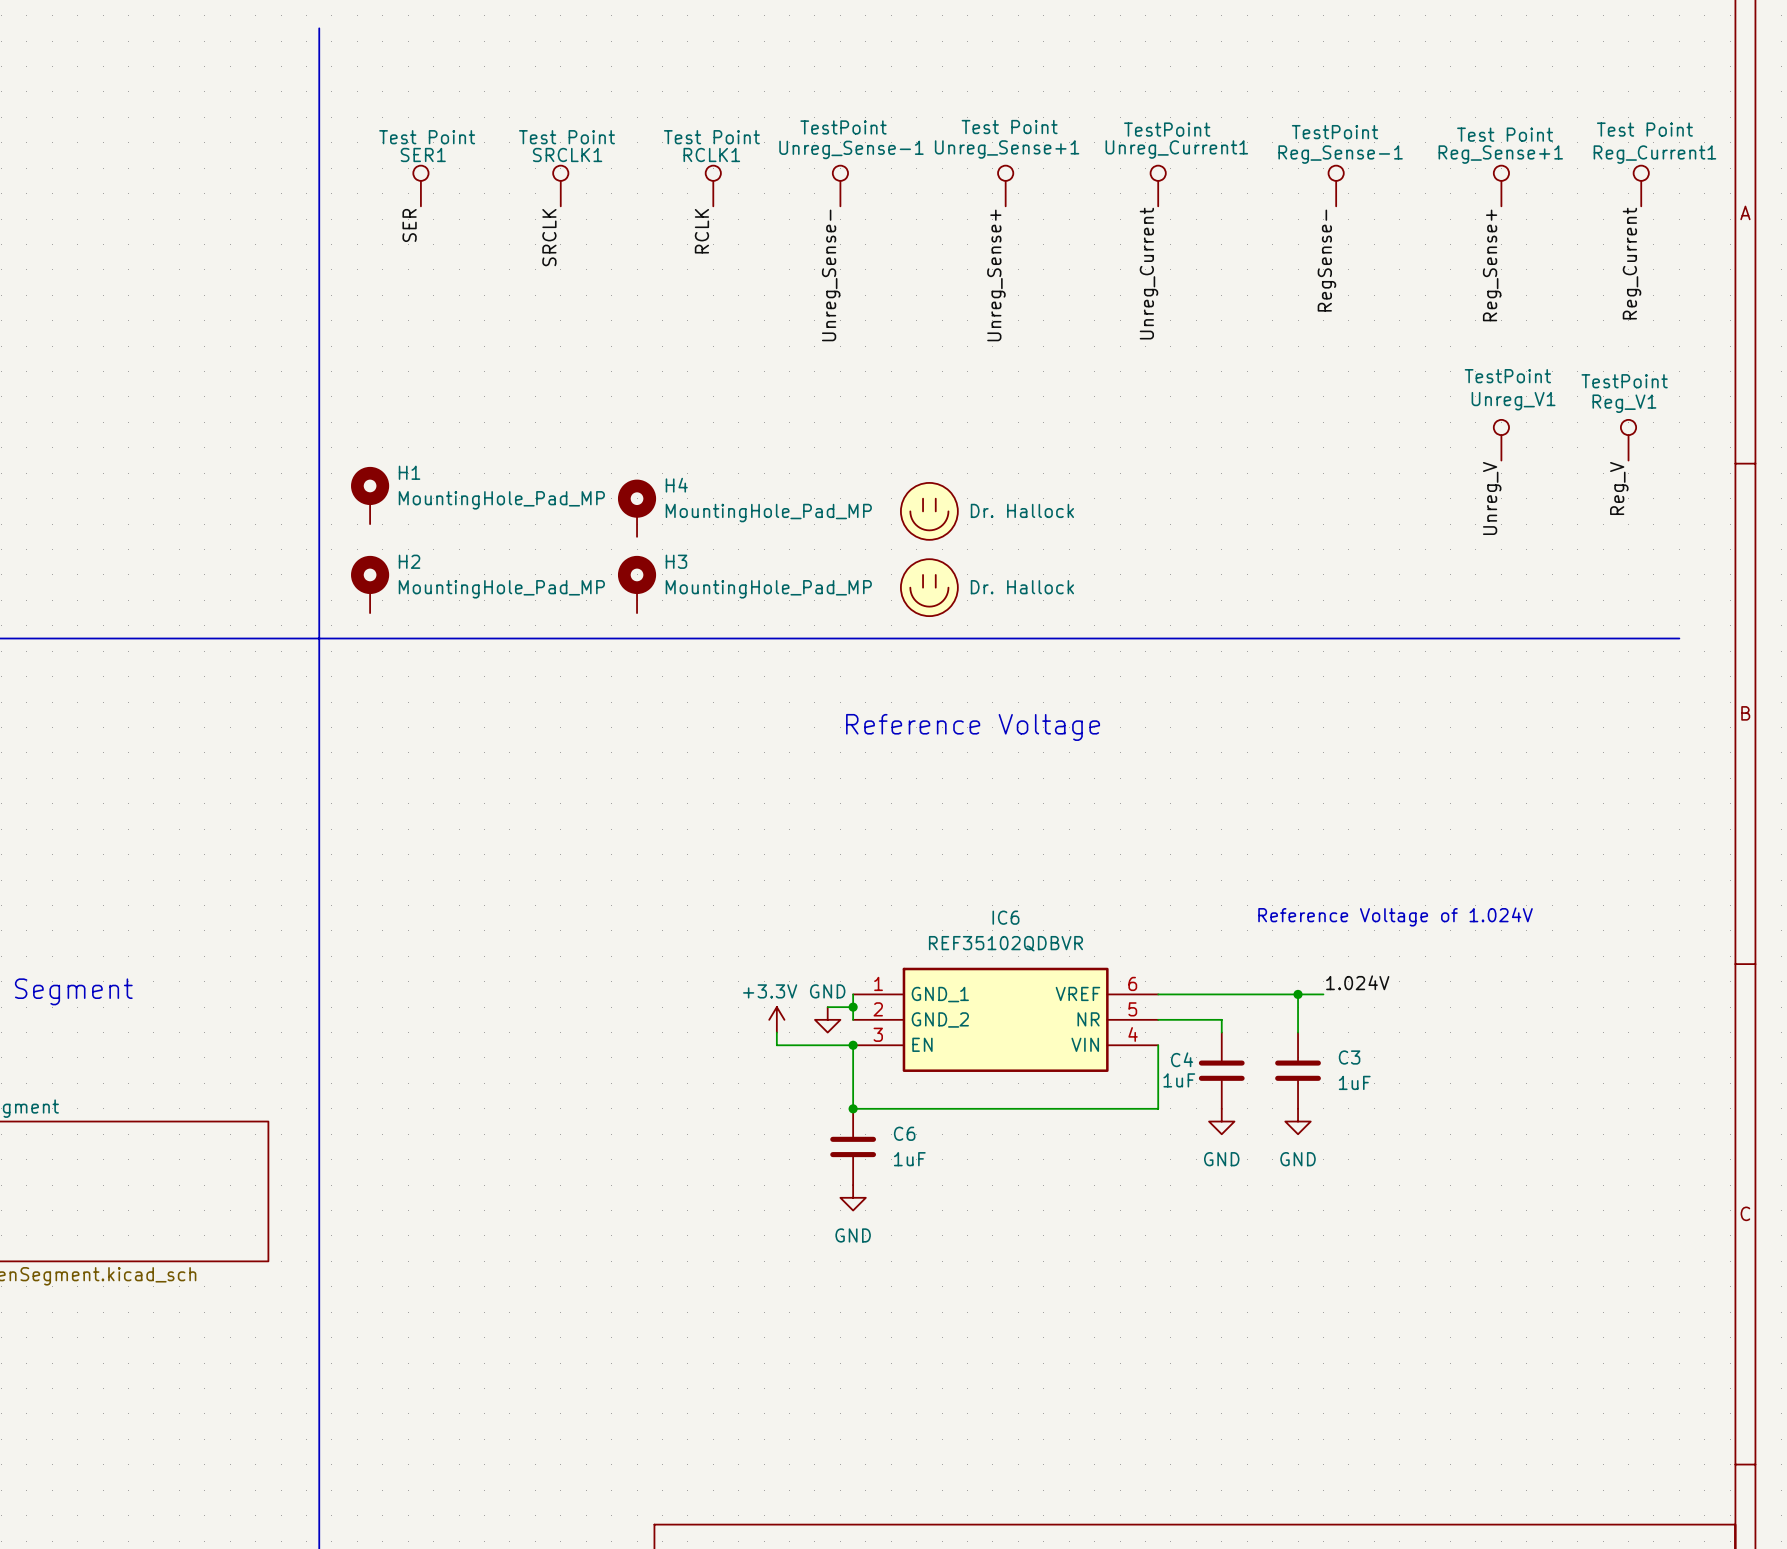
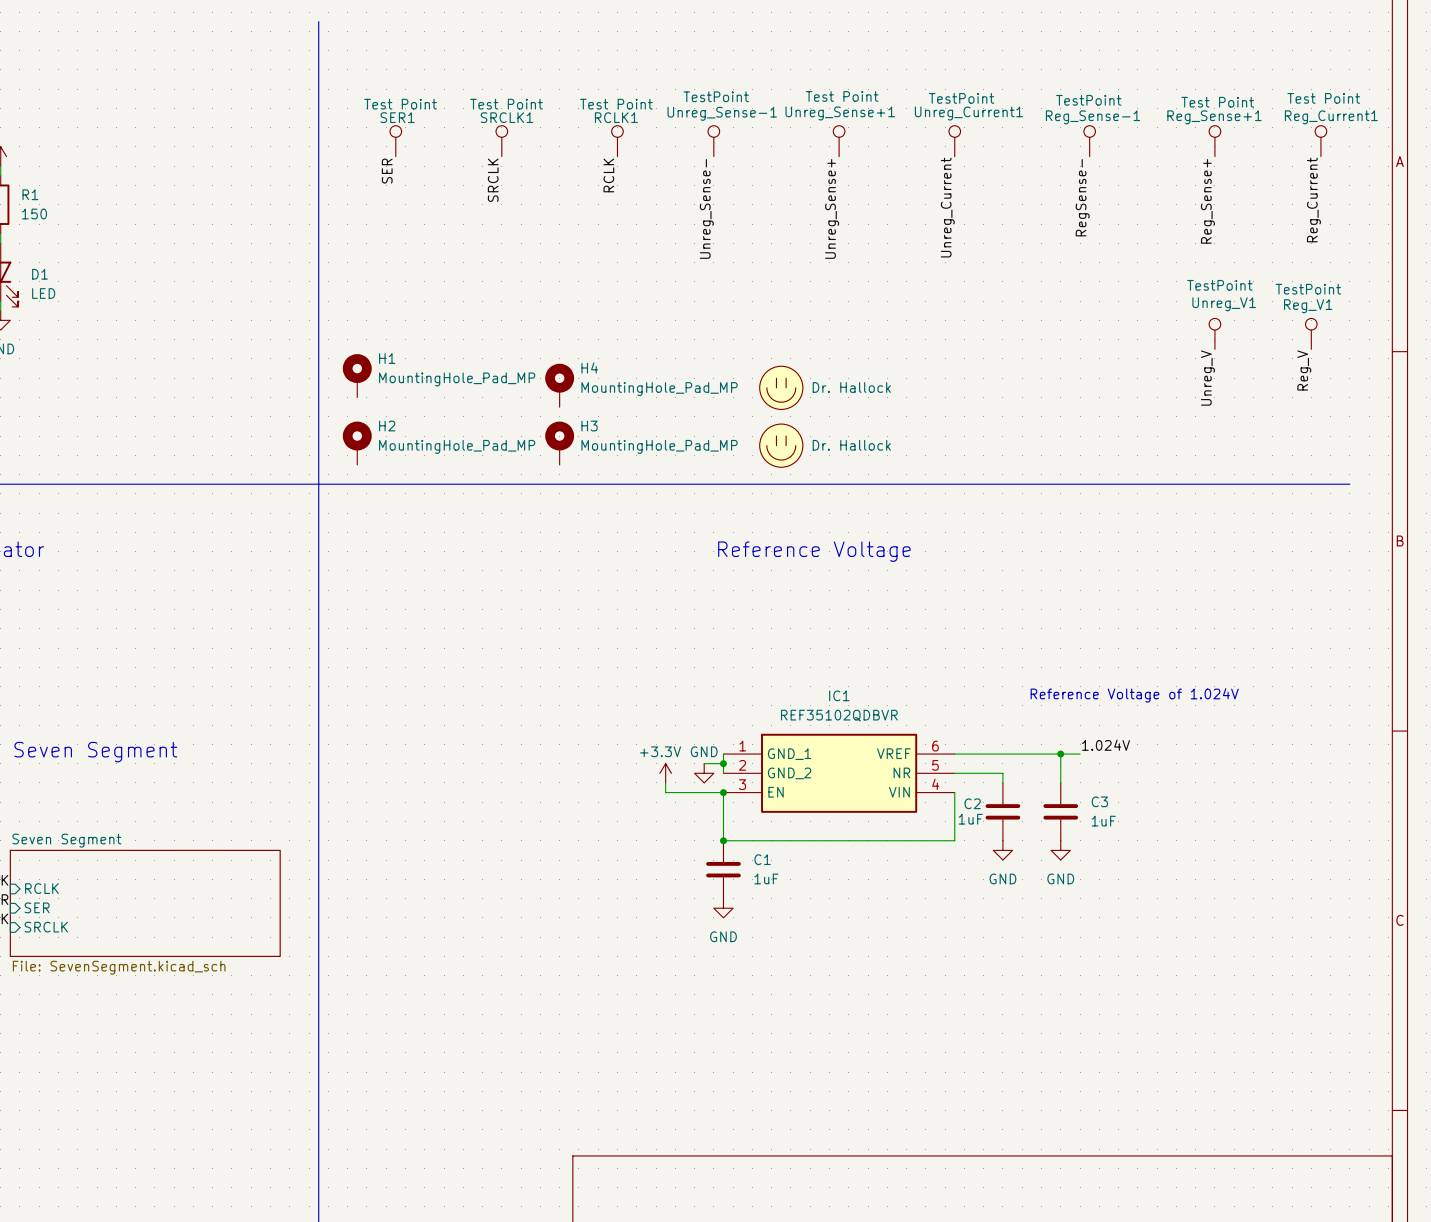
IC6 name: IC6 (1005, 917) -> IC1 (839, 695)
C4 name: C4 (1182, 1059) -> C2 (972, 803)
C6 name: C6 (904, 1133) -> C1 (762, 859)

